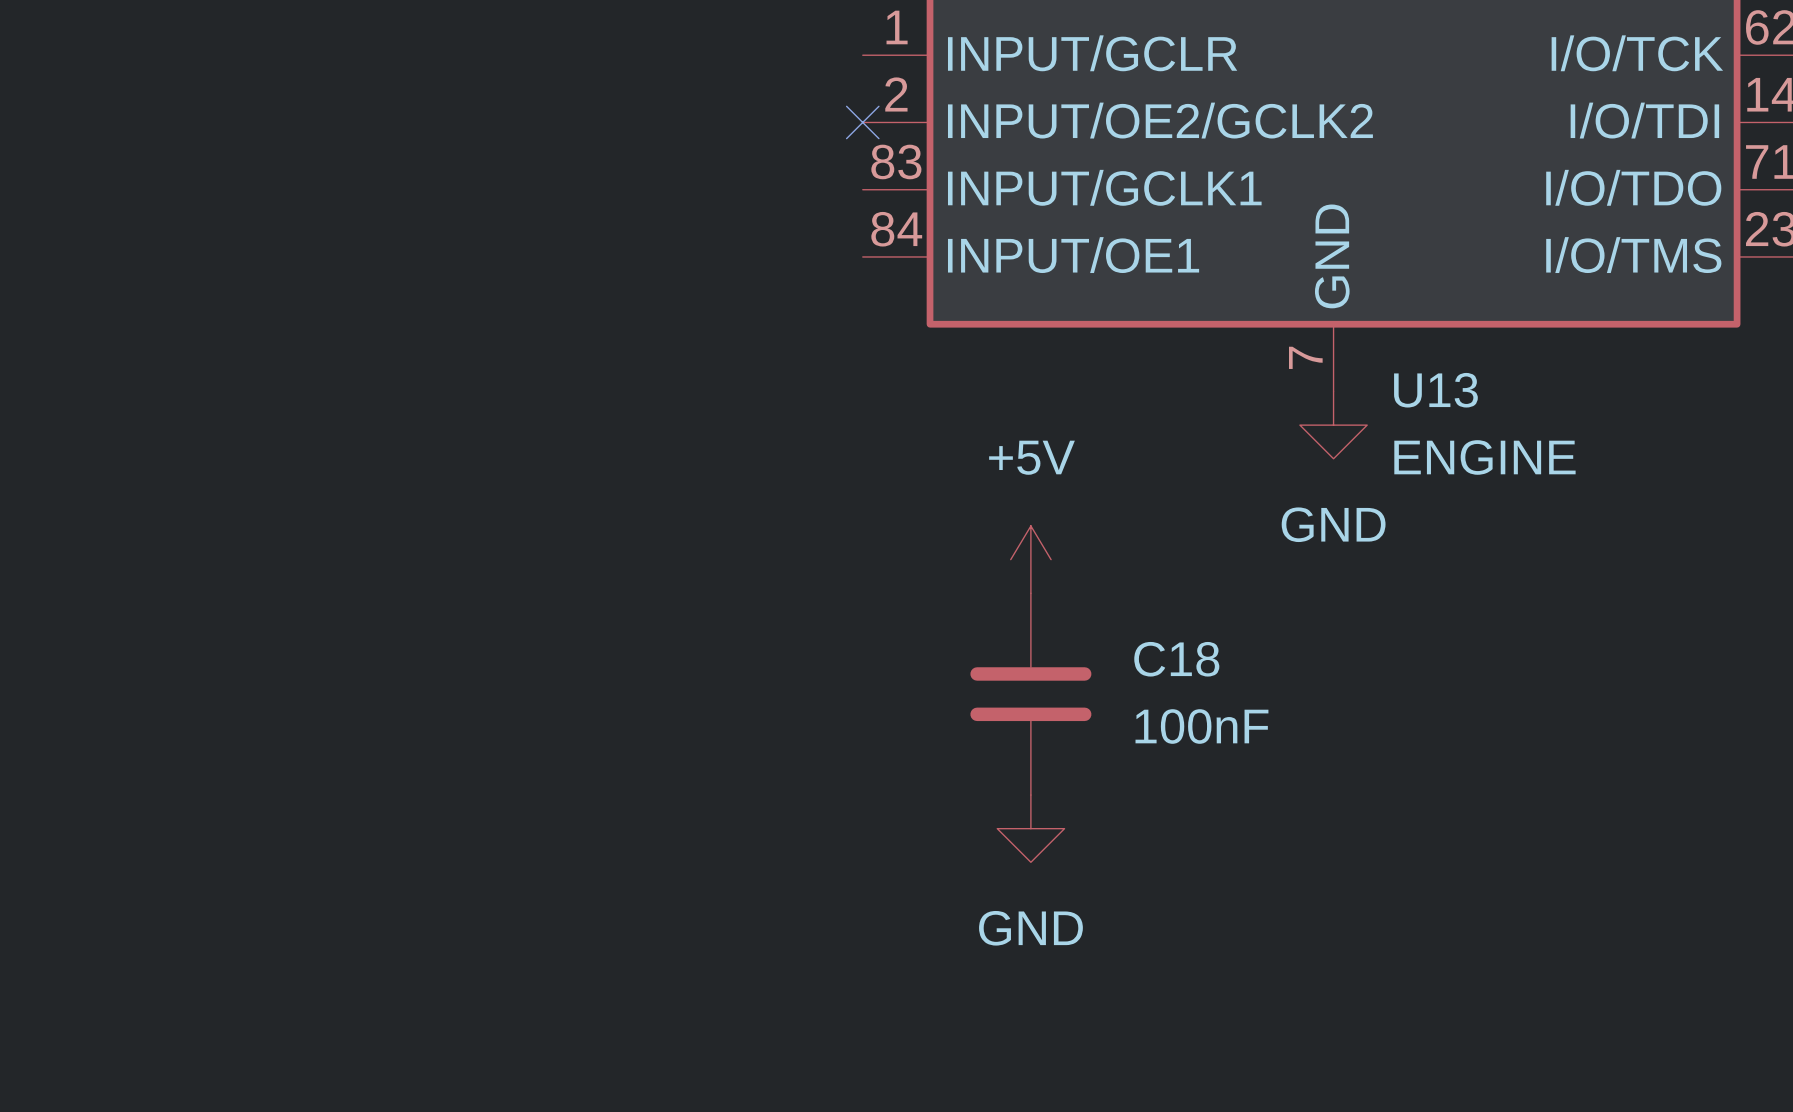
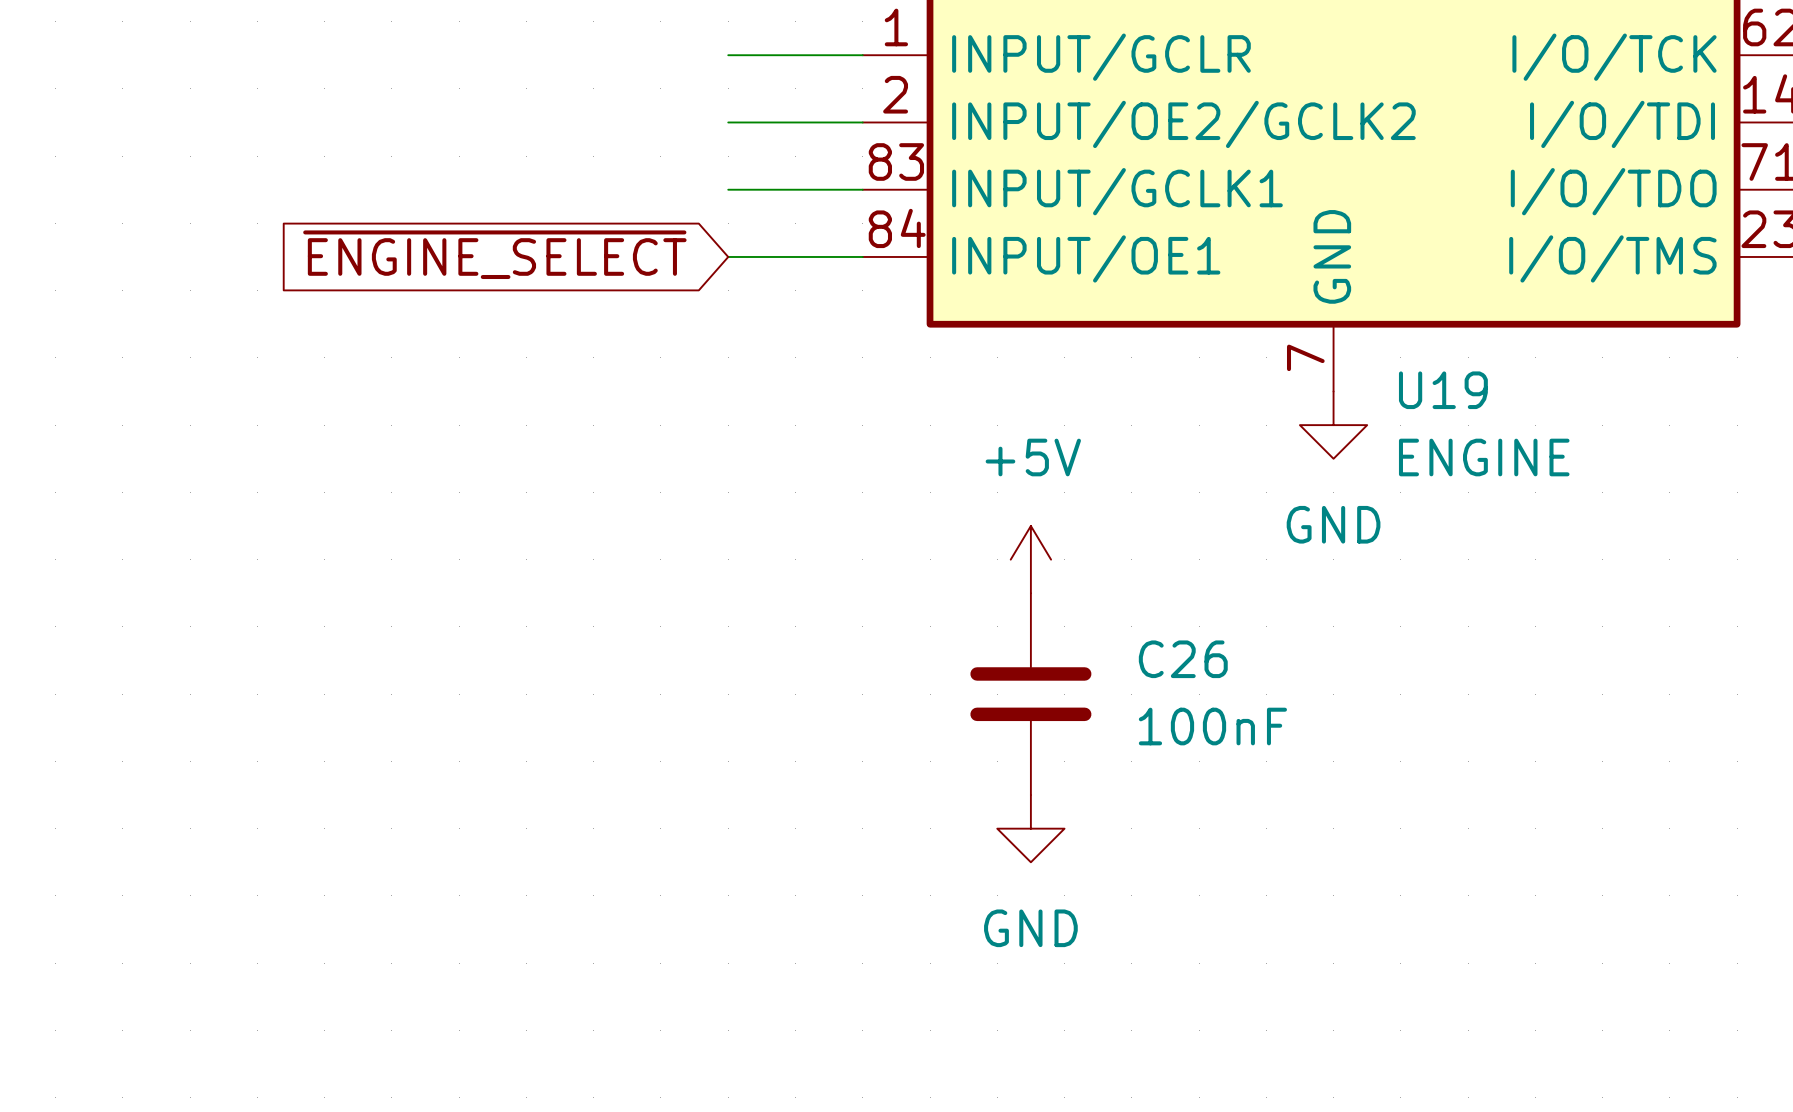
wire: none -> (728, 55) (862, 55)
wire: none -> (728, 122) (862, 122)
no-connect mark: (862, 122) -> none
wire: none -> (728, 189) (862, 189)
wire: none -> (728, 256) (862, 256)
global label: none -> ~{ENGINE_SELECT} (494, 254)
U13 name: U13 (1435, 390) -> U19 (1443, 390)
C18 name: C18 (1176, 659) -> C26 (1183, 659)

